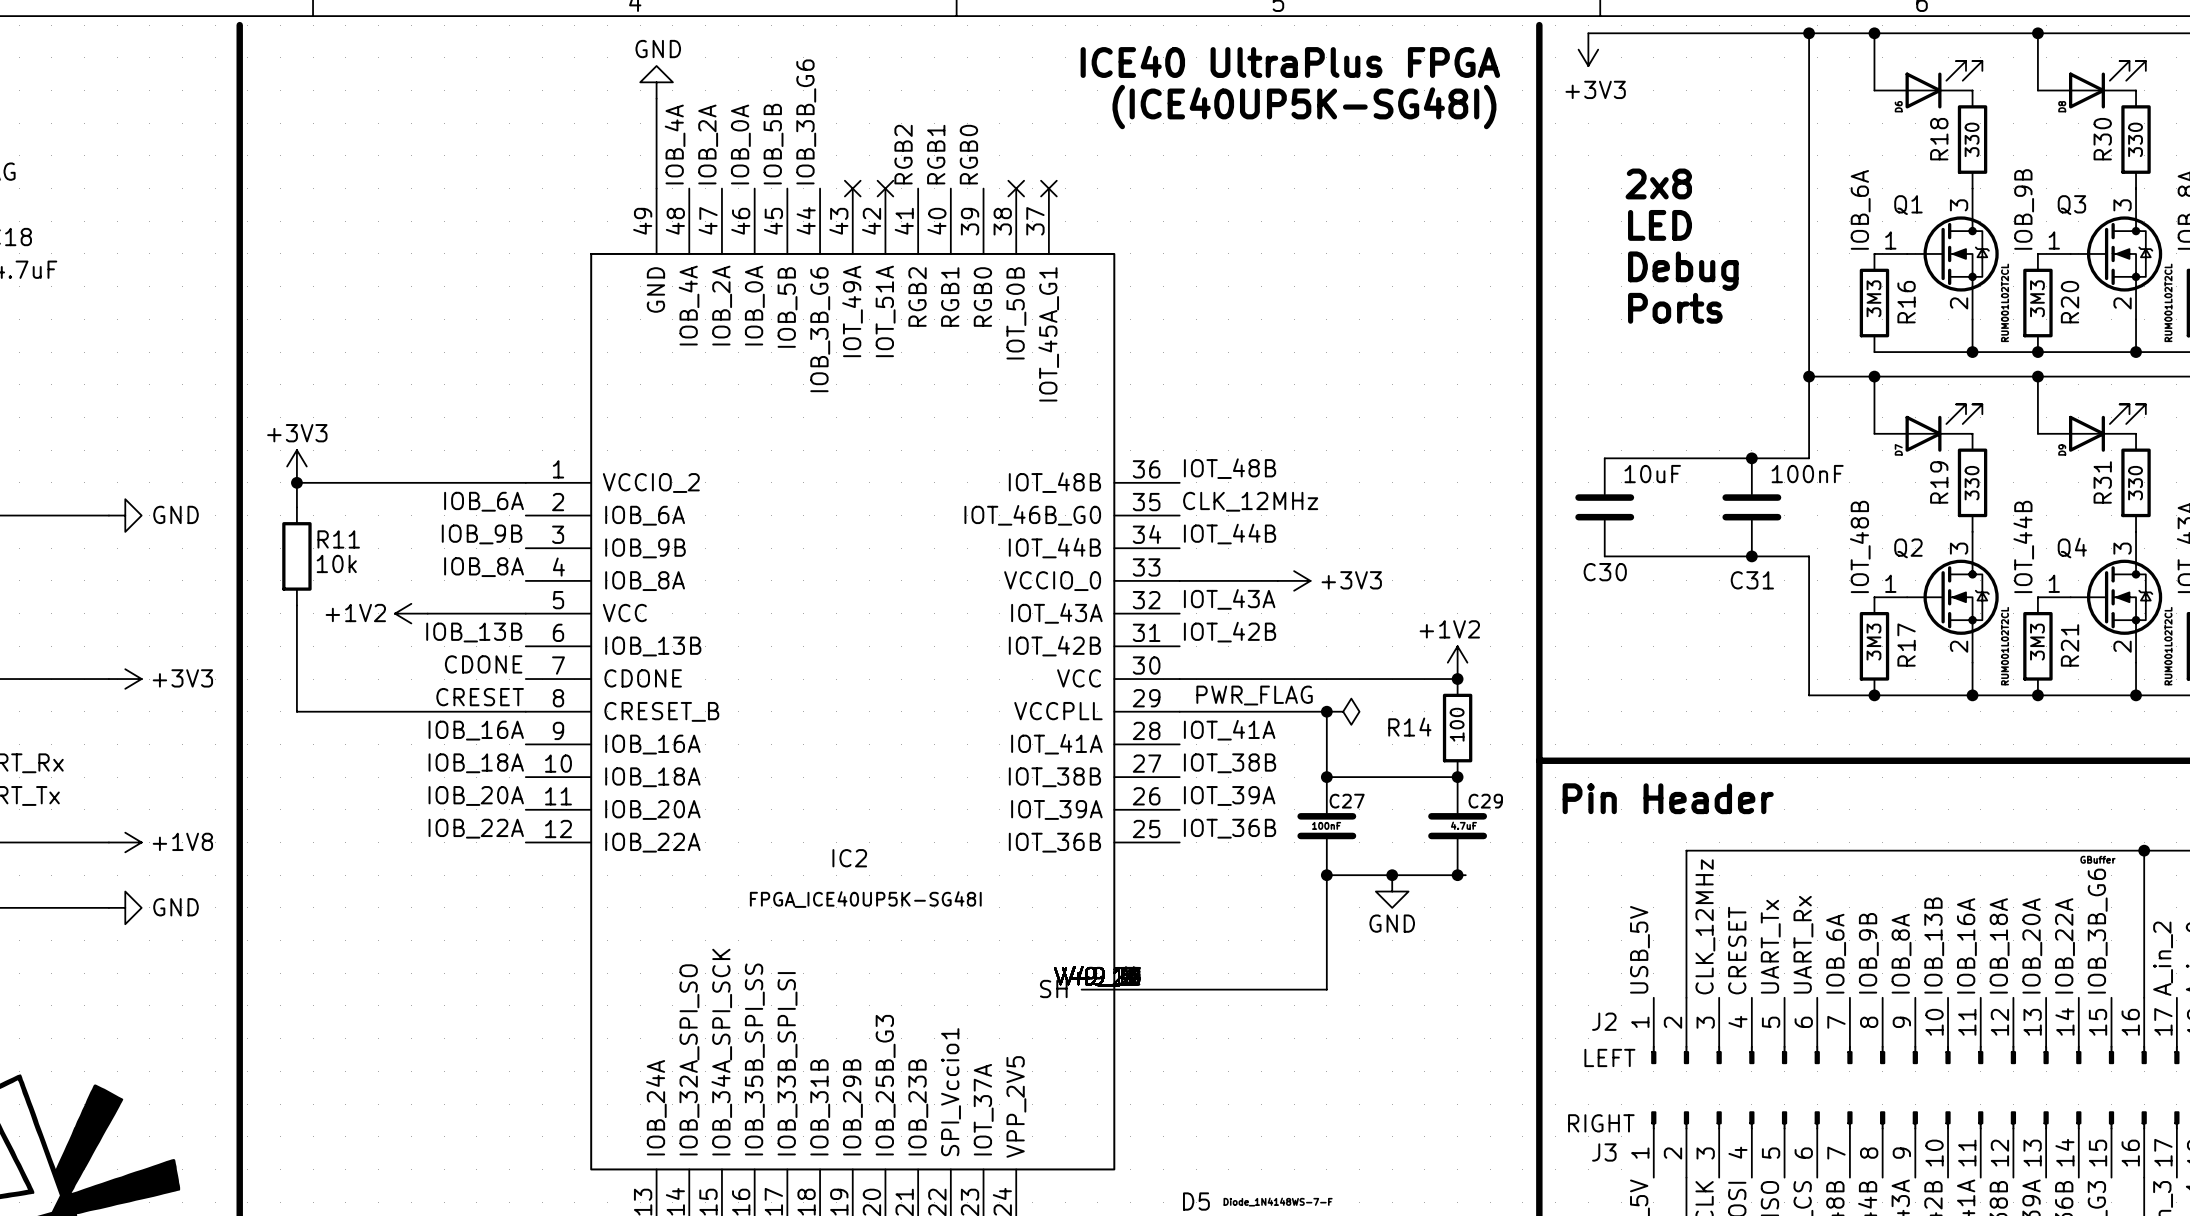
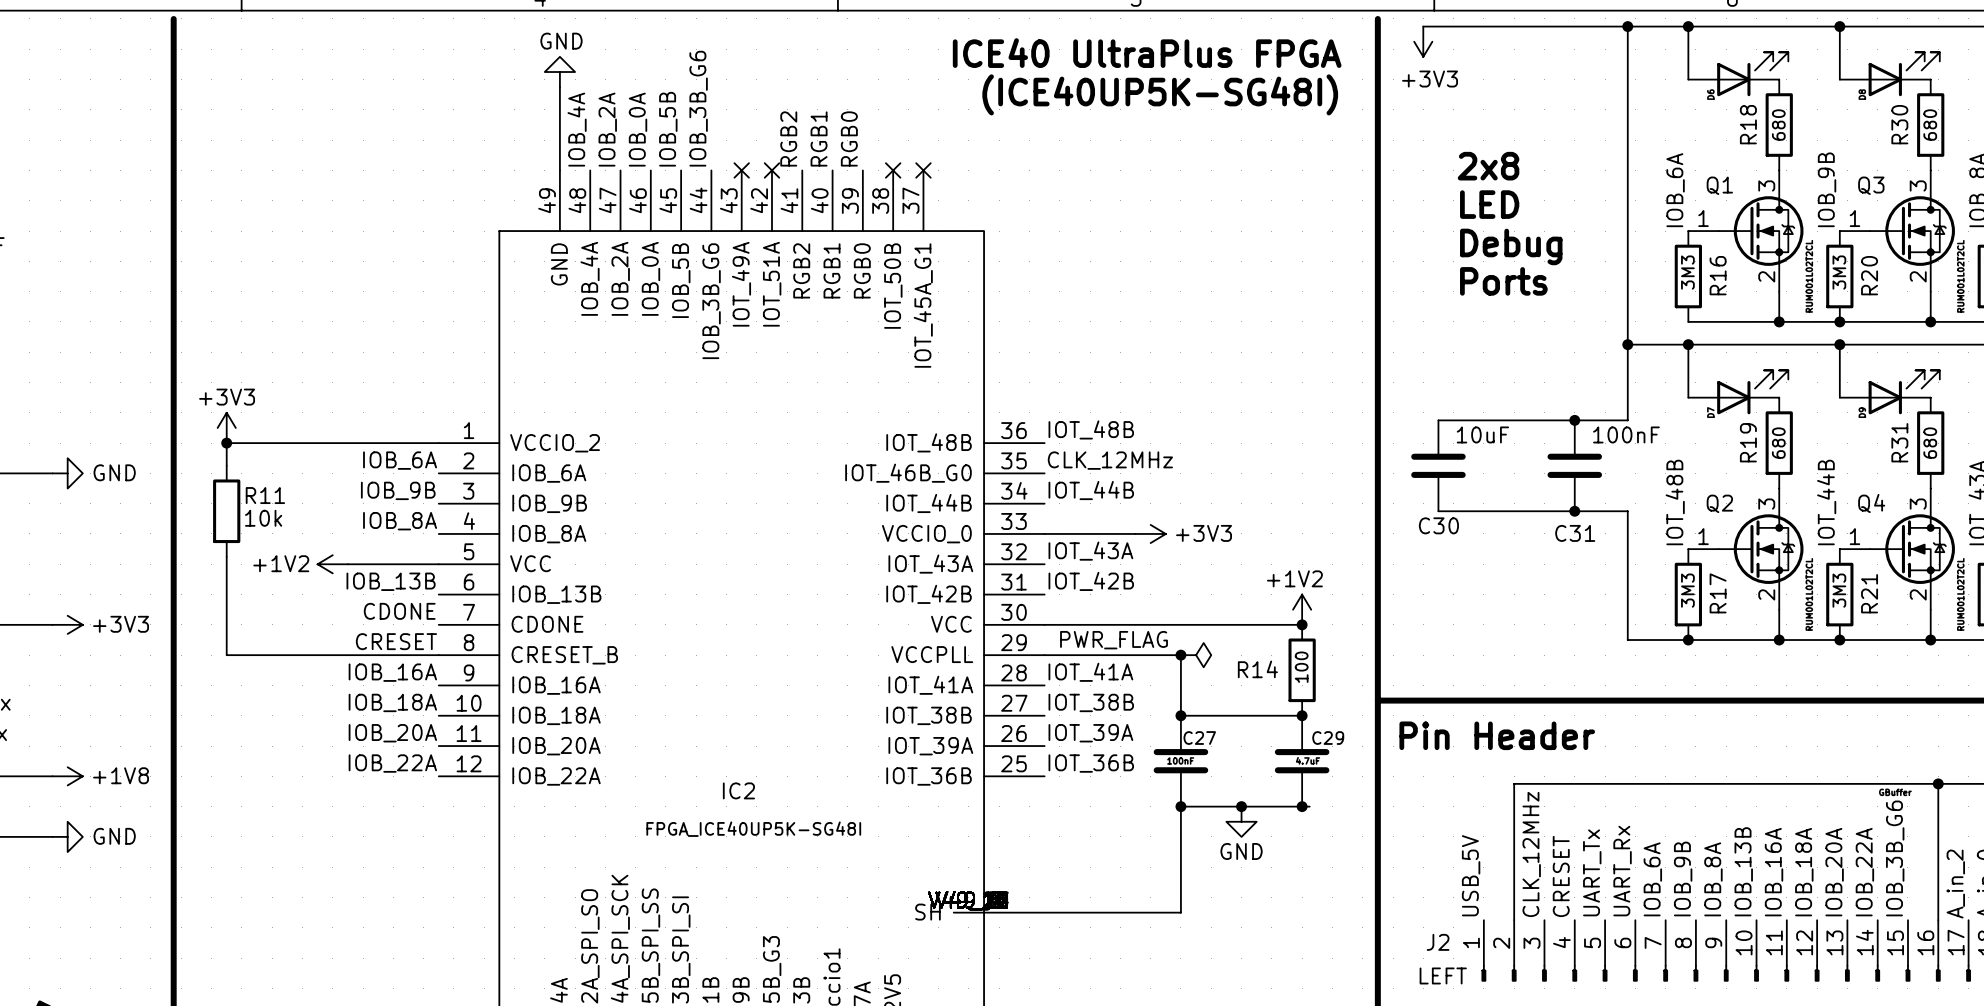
R18 value: 330 (1972, 139) -> 680 (1778, 125)
R30 value: 330 (2135, 139) -> 680 (1930, 125)
R19 value: 330 (1972, 483) -> 680 (1778, 443)
R31 value: 330 (2135, 483) -> 680 (1930, 443)

